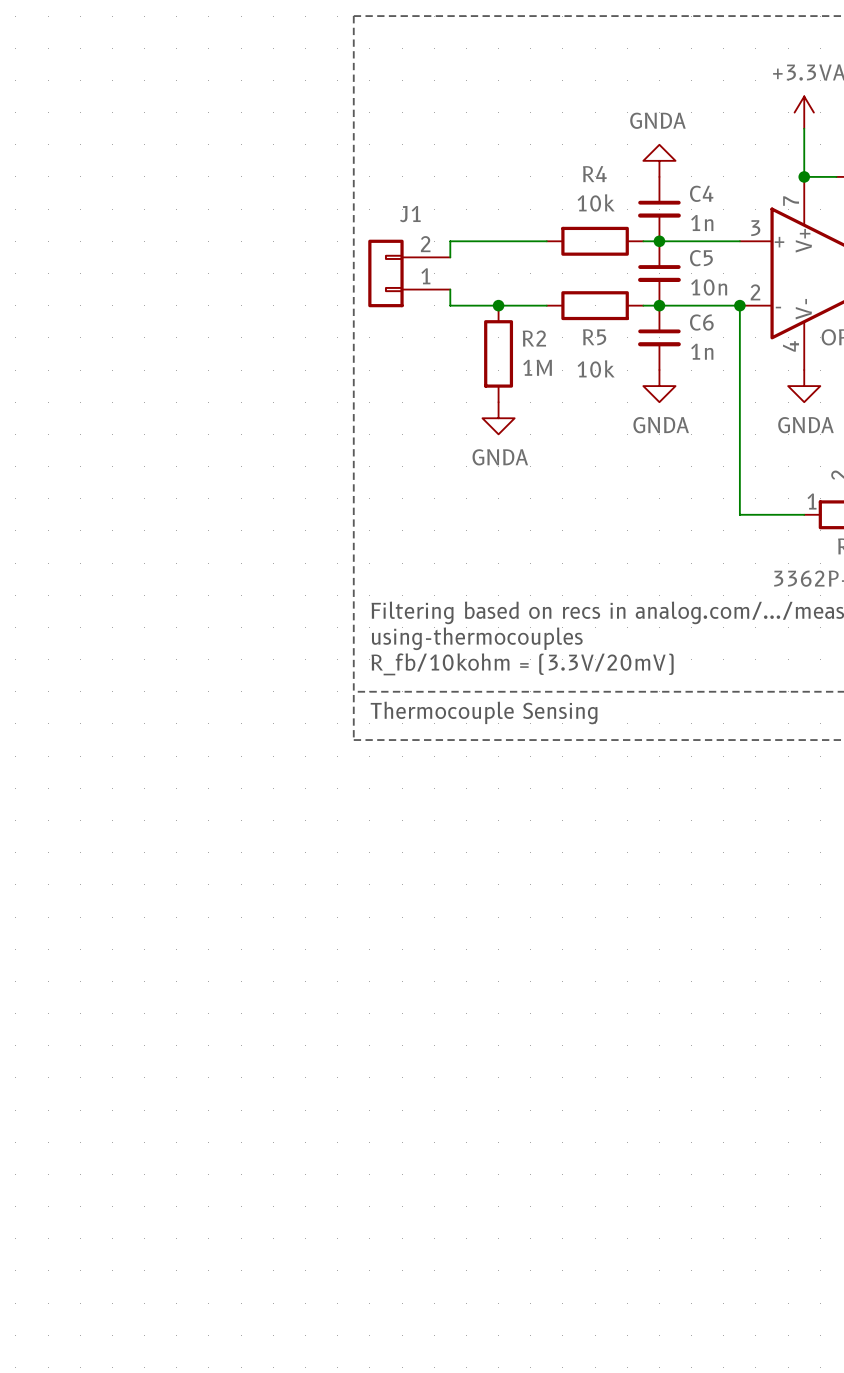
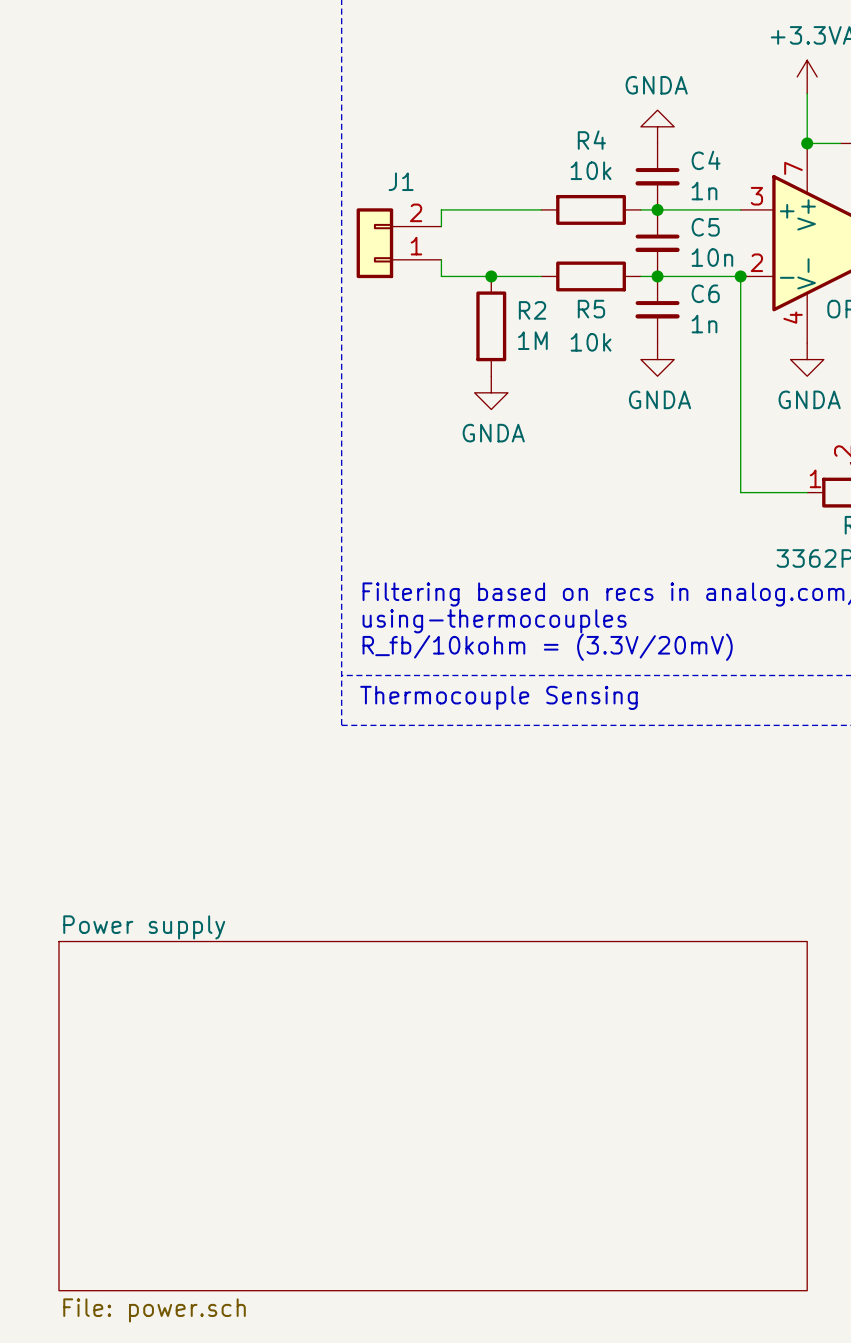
sheet Power supply: none -> File: power.sch (433, 1116)

